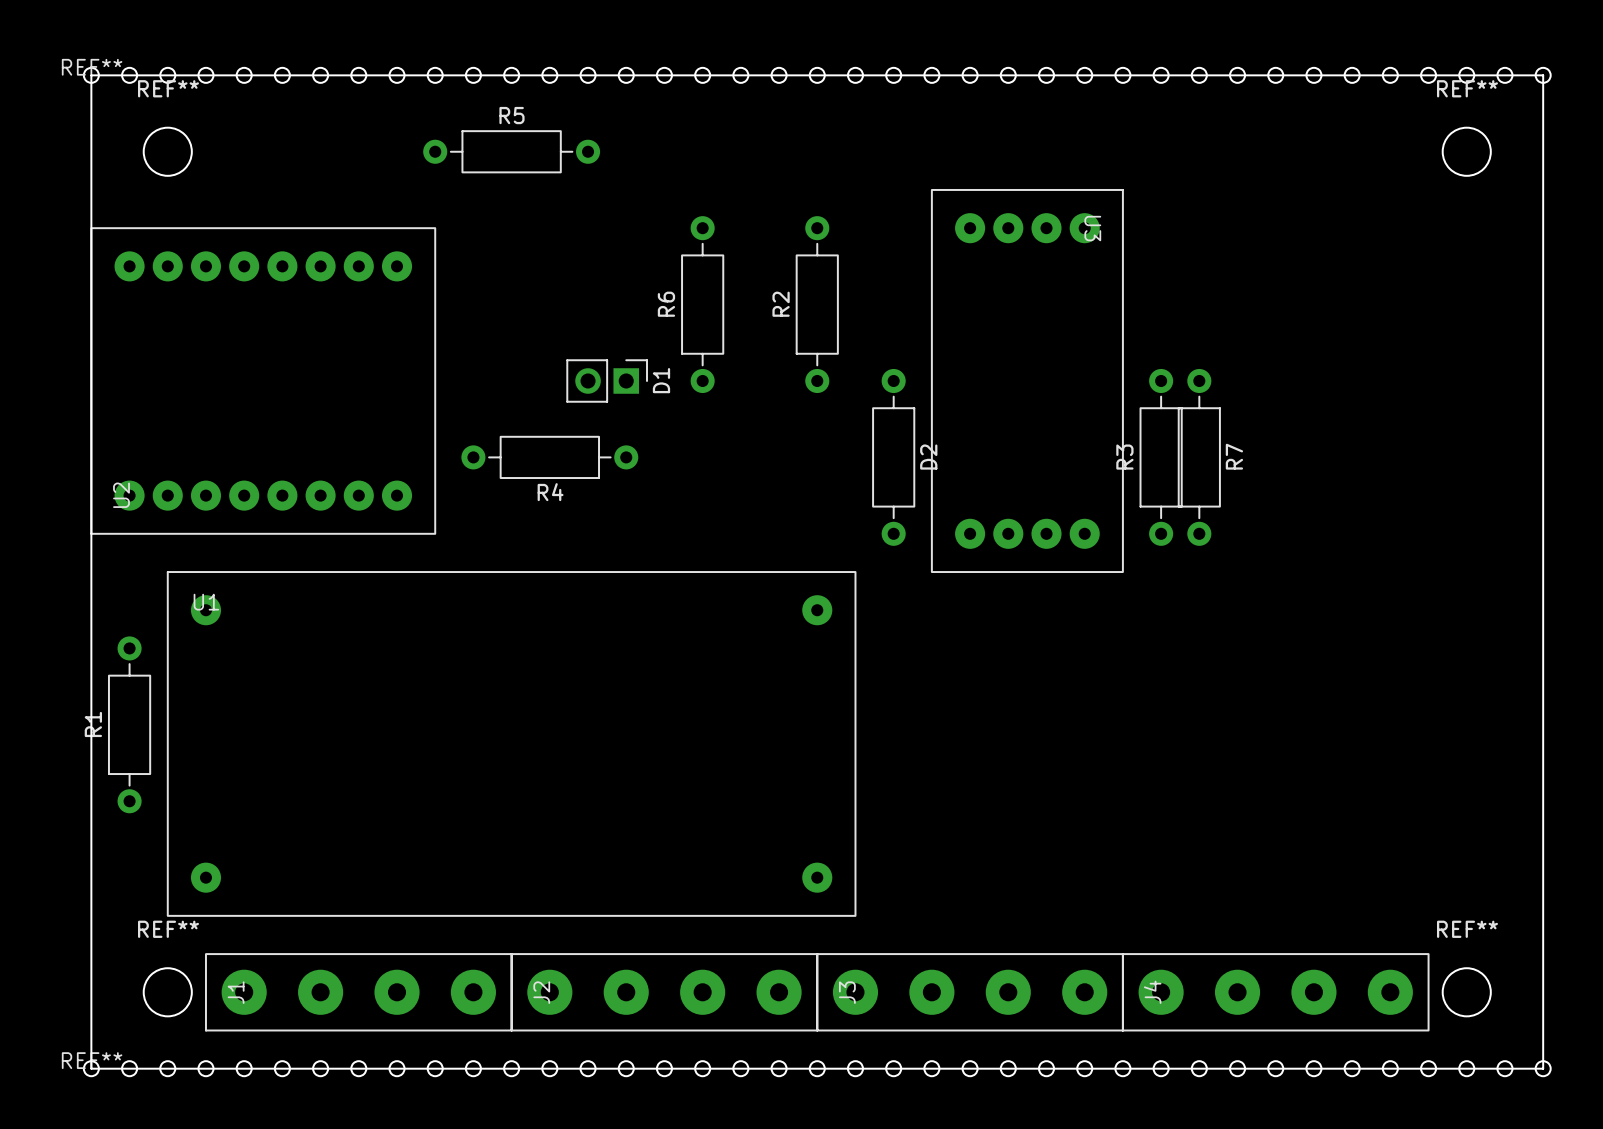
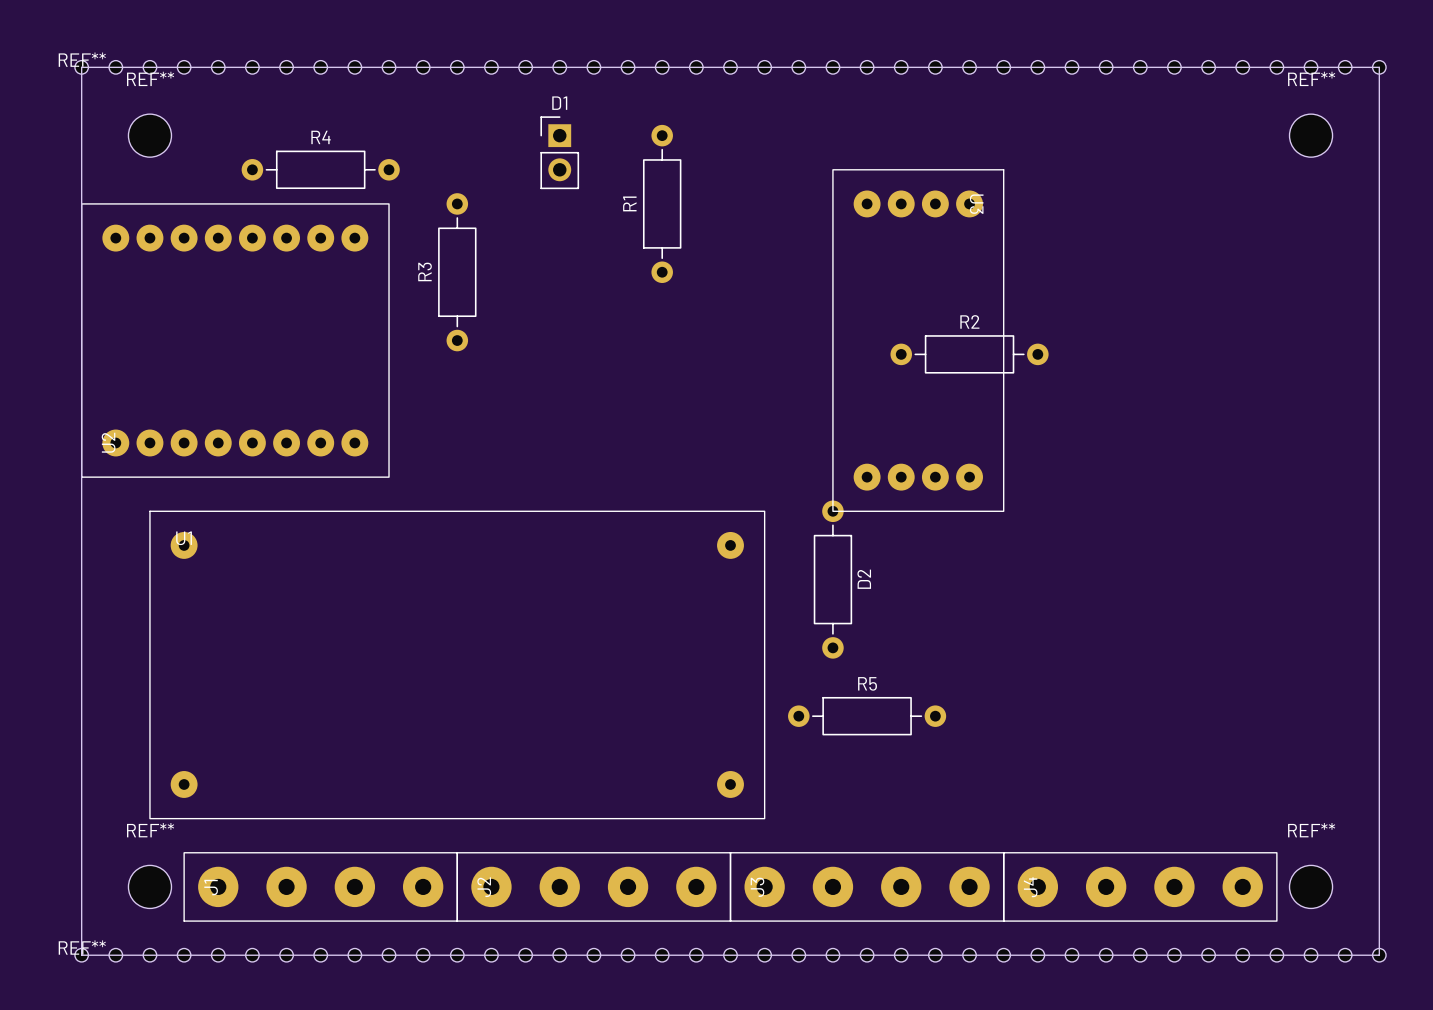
R5 position: (511, 151) -> (867, 716)
R6: (702, 304) -> none
R2 rotation: 0° (817, 304) -> 90° clockwise (969, 354)
R2 position: (817, 304) -> (969, 354)
D1 rotation: 0° (607, 380) -> 90° counterclockwise (559, 152)
D1 position: (607, 380) -> (559, 152)
R4 position: (549, 457) -> (320, 169)
D2 position: (893, 457) -> (832, 579)
R3 position: (1161, 457) -> (457, 272)
R7: (1199, 457) -> none
R4 name position: R4 (550, 492) -> R4 (321, 137)
R1 position: (129, 724) -> (662, 203)

